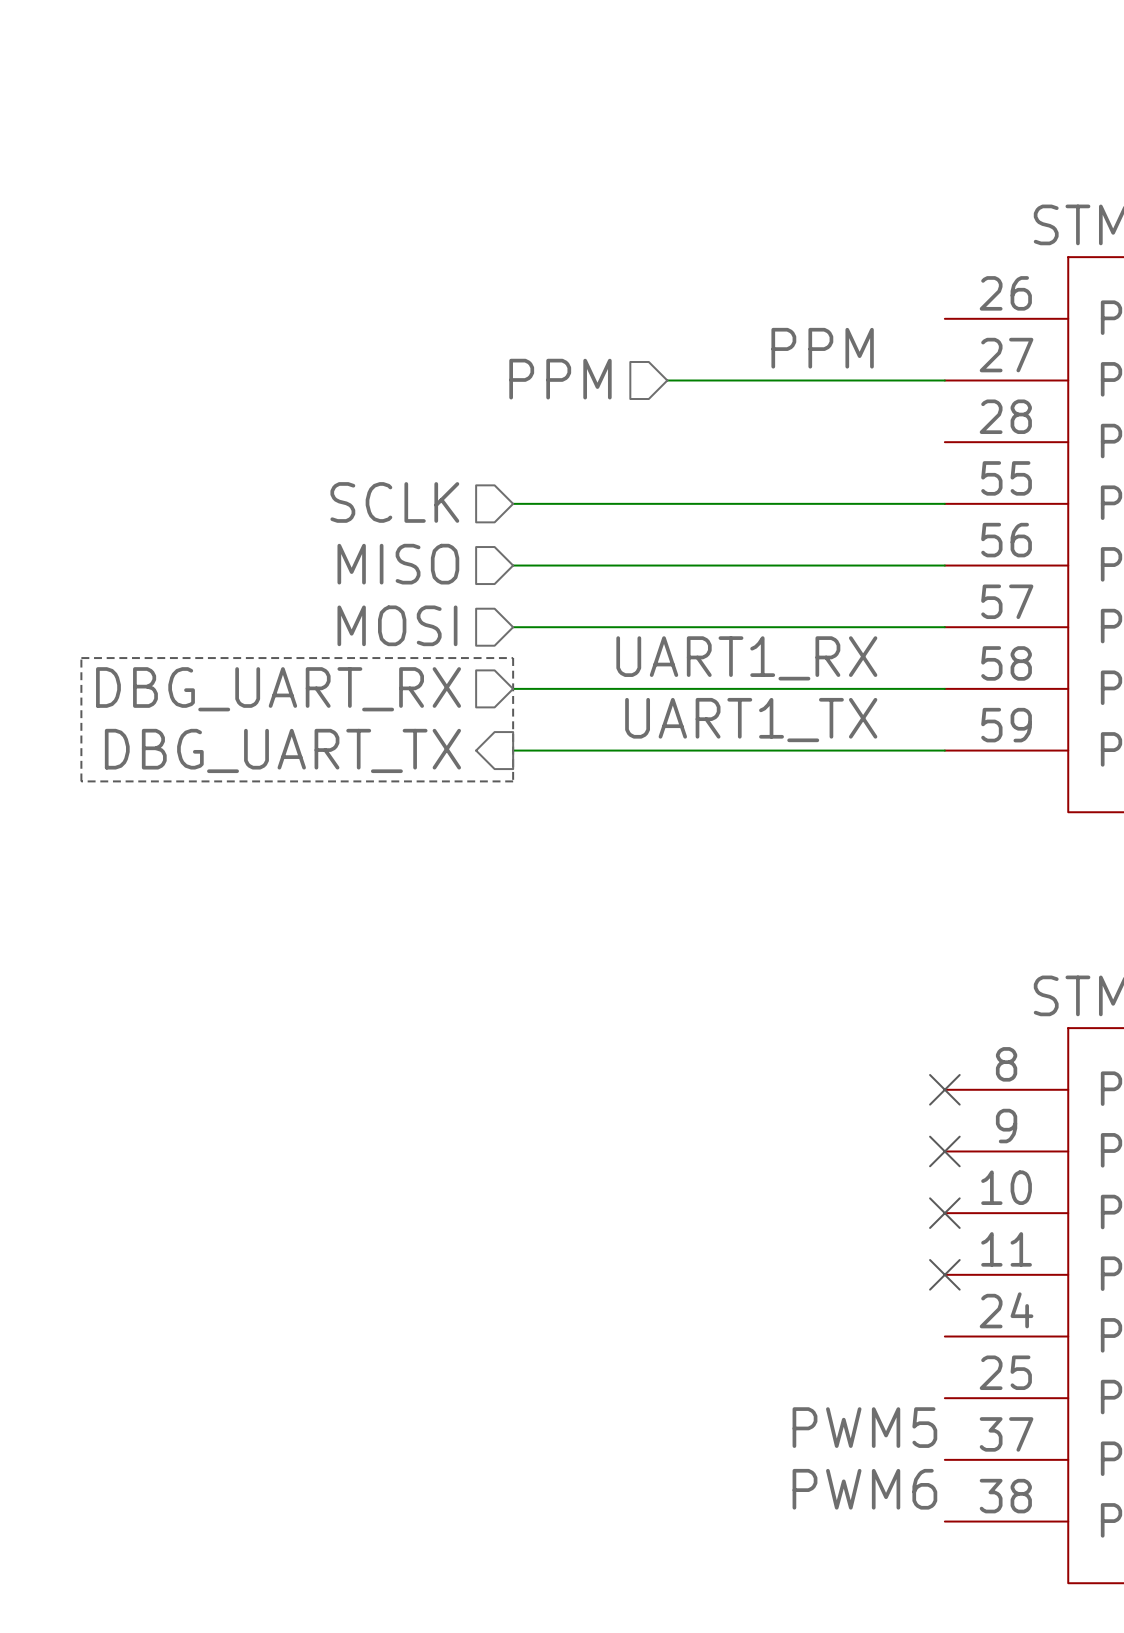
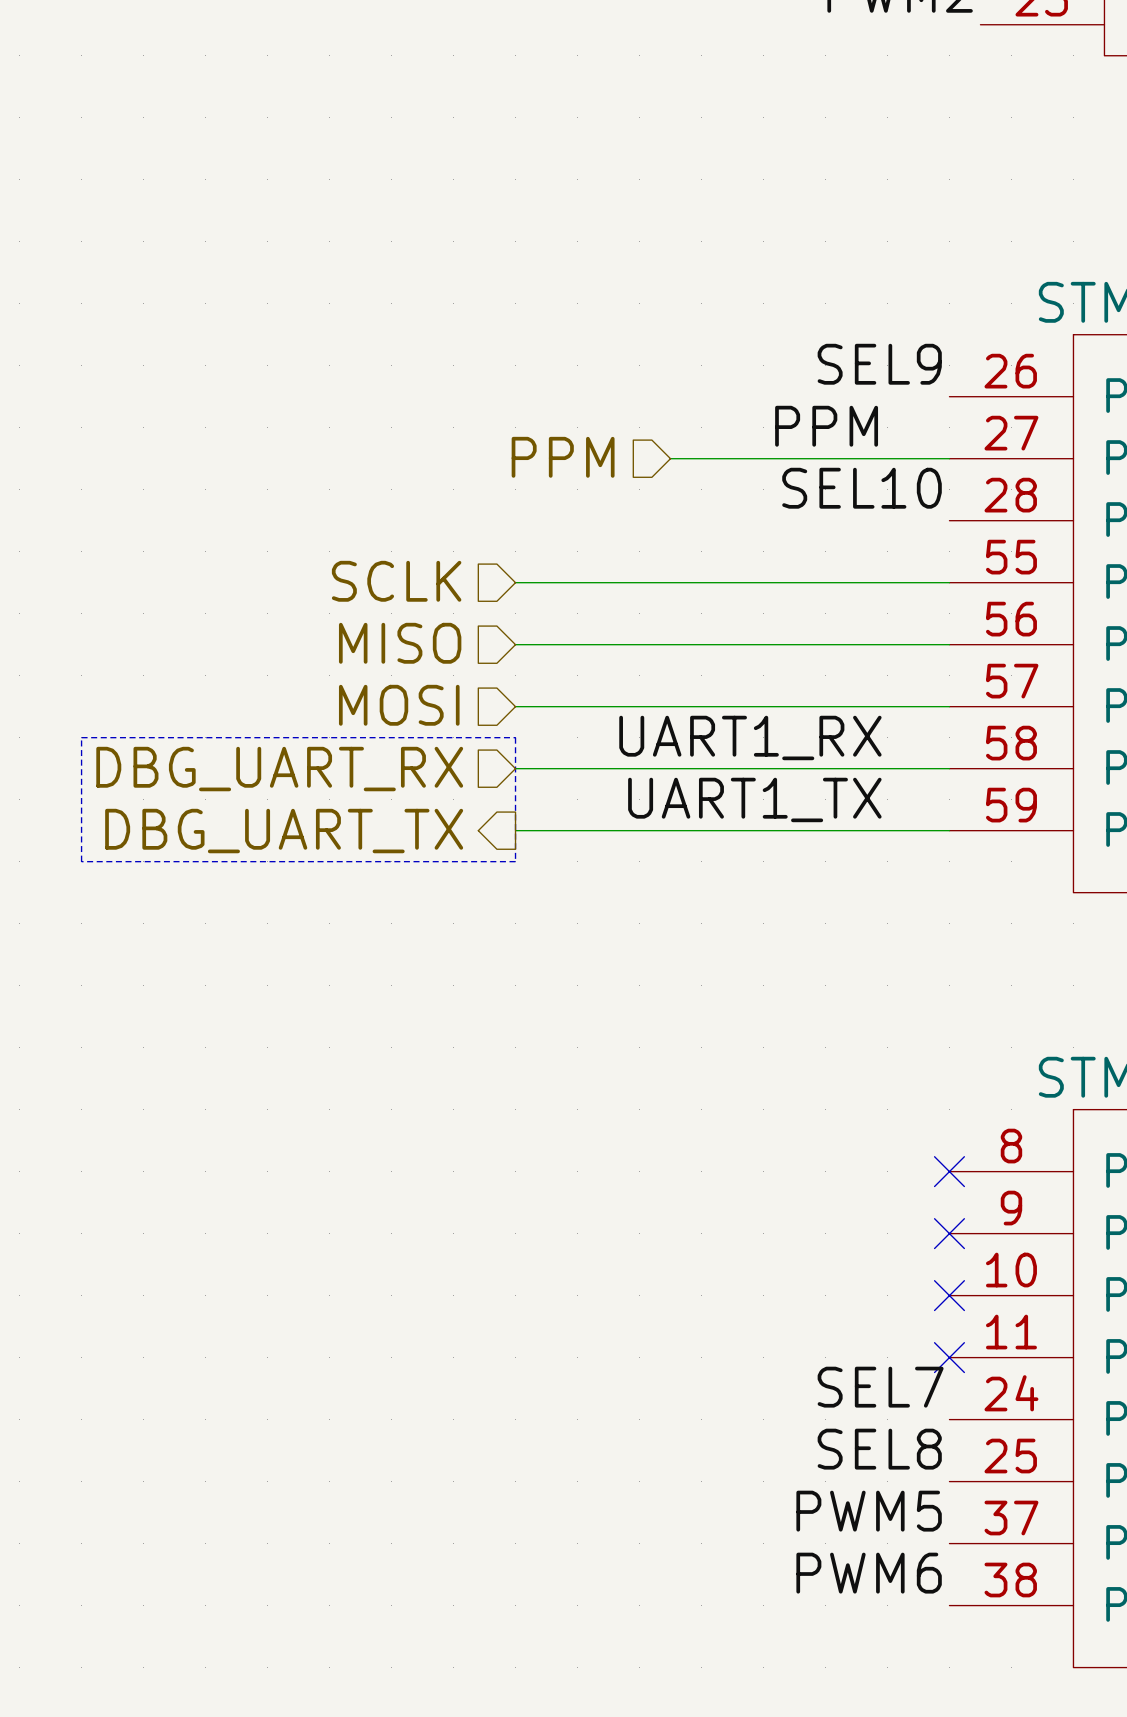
label: none -> SEL9 (879, 364)
label: none -> SEL10 (862, 488)
label: none -> SEL7 (880, 1387)
label: none -> SEL8 (879, 1449)

